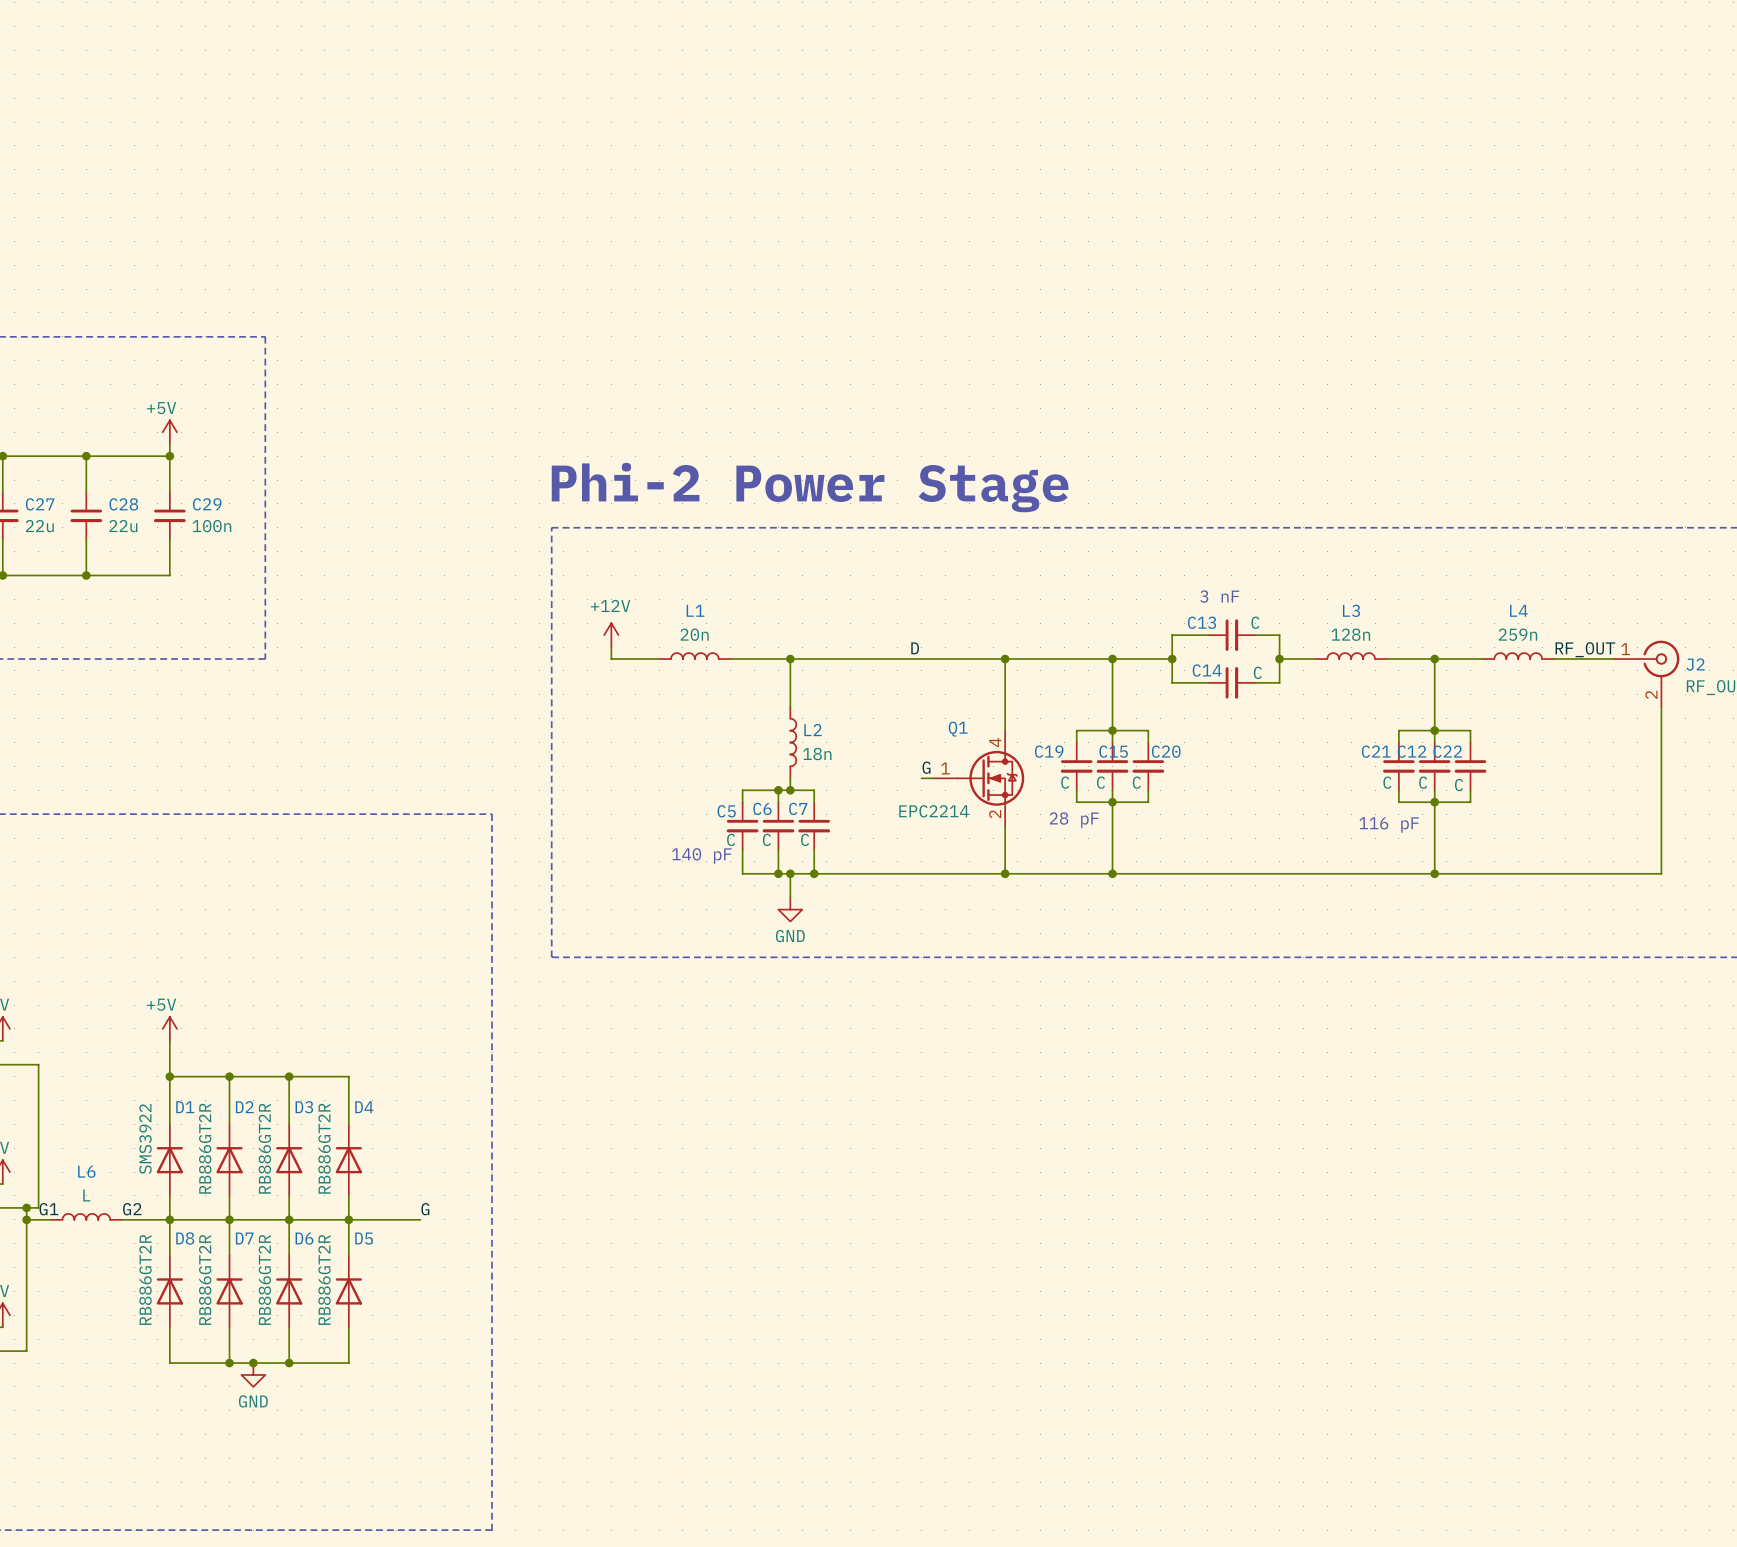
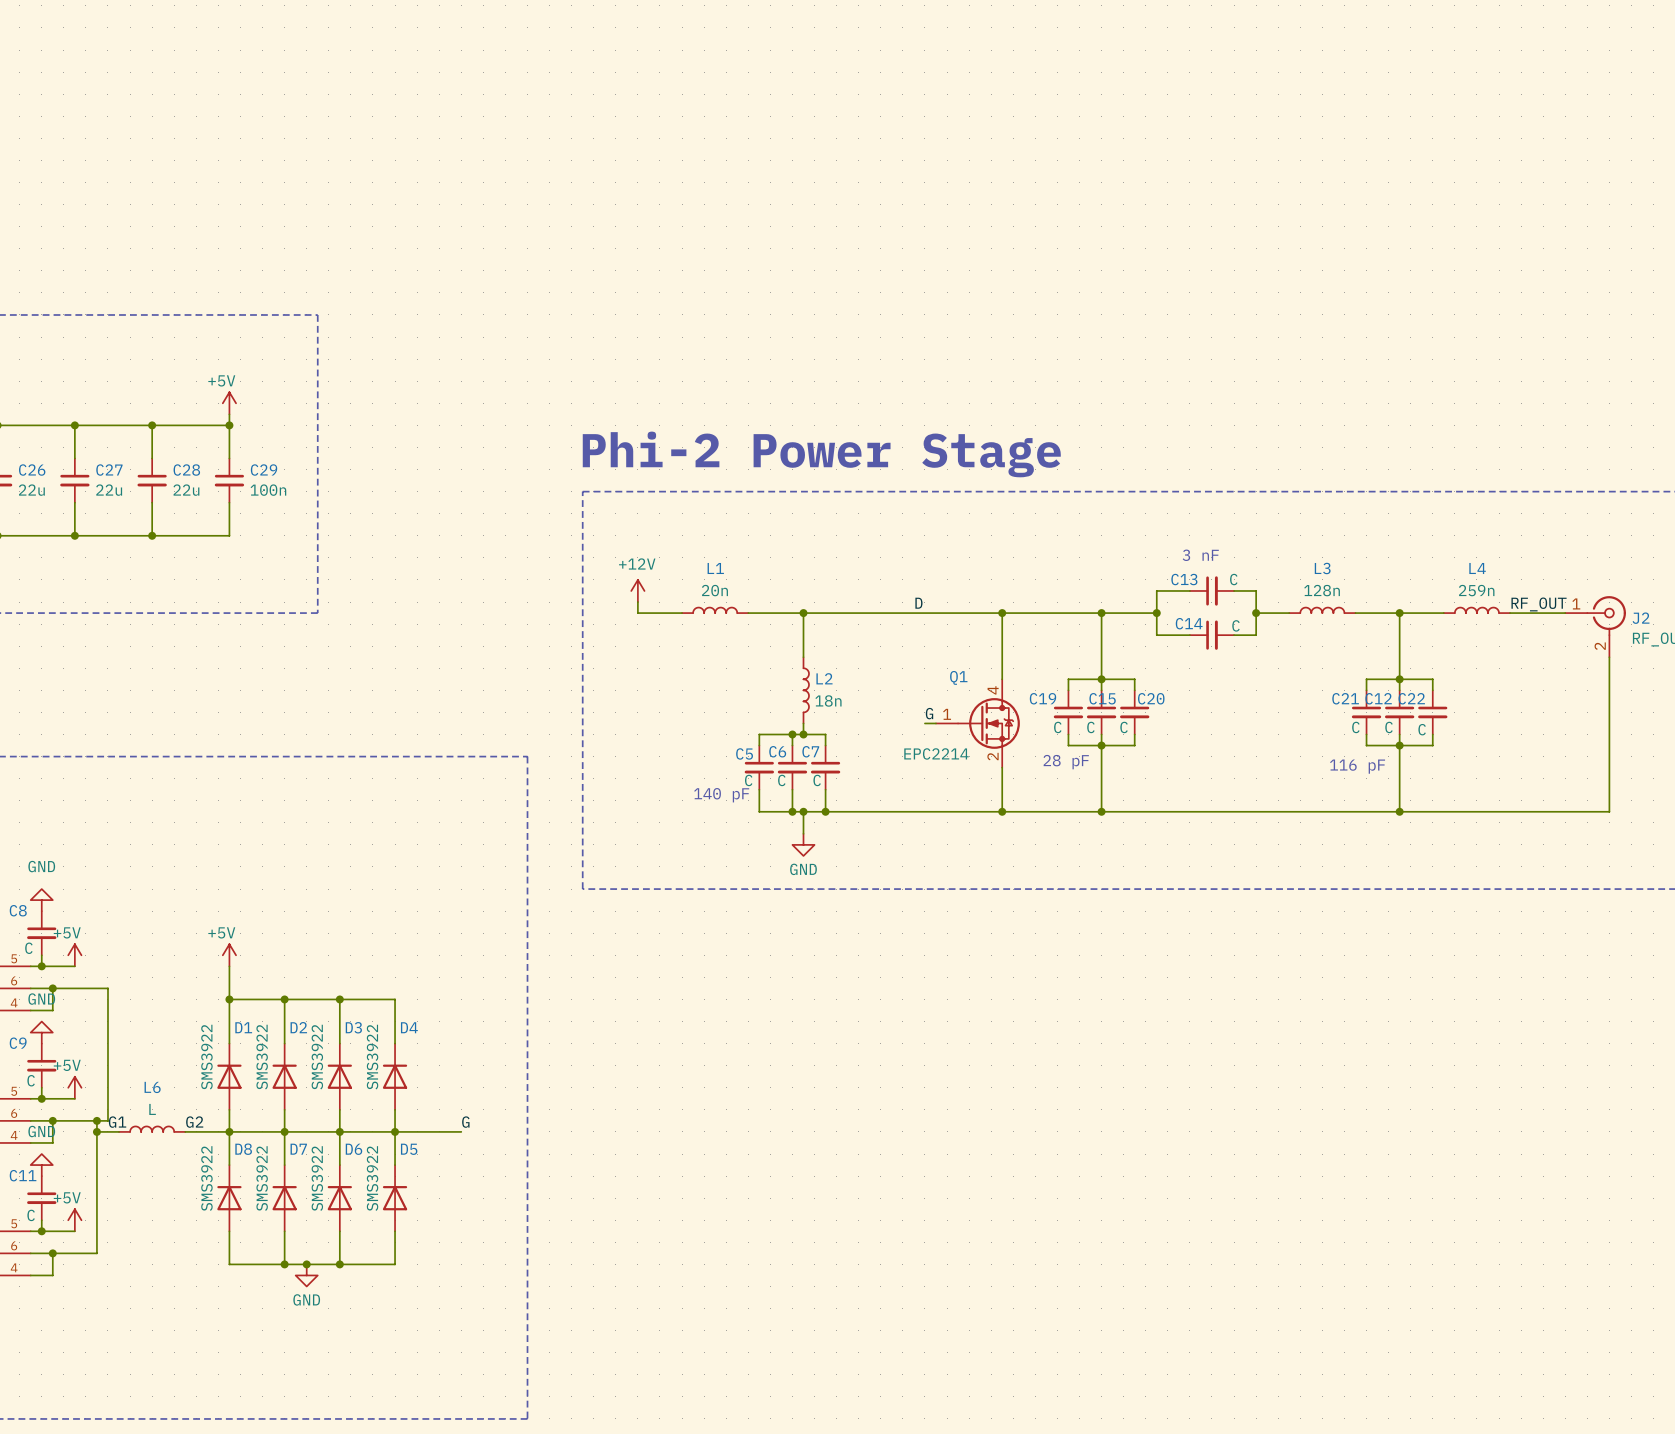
D2 value: RB886GT2R (205, 1148) -> SMS3922 (262, 1057)
D3 value: RB886GT2R (264, 1148) -> SMS3922 (317, 1057)
D4 value: RB886GT2R (324, 1148) -> SMS3922 (372, 1057)
D8 value: RB886GT2R (145, 1279) -> SMS3922 (206, 1178)
D7 value: RB886GT2R (205, 1279) -> SMS3922 (262, 1178)
D6 value: RB886GT2R (264, 1279) -> SMS3922 (317, 1178)
D5 value: RB886GT2R (324, 1279) -> SMS3922 (372, 1178)

